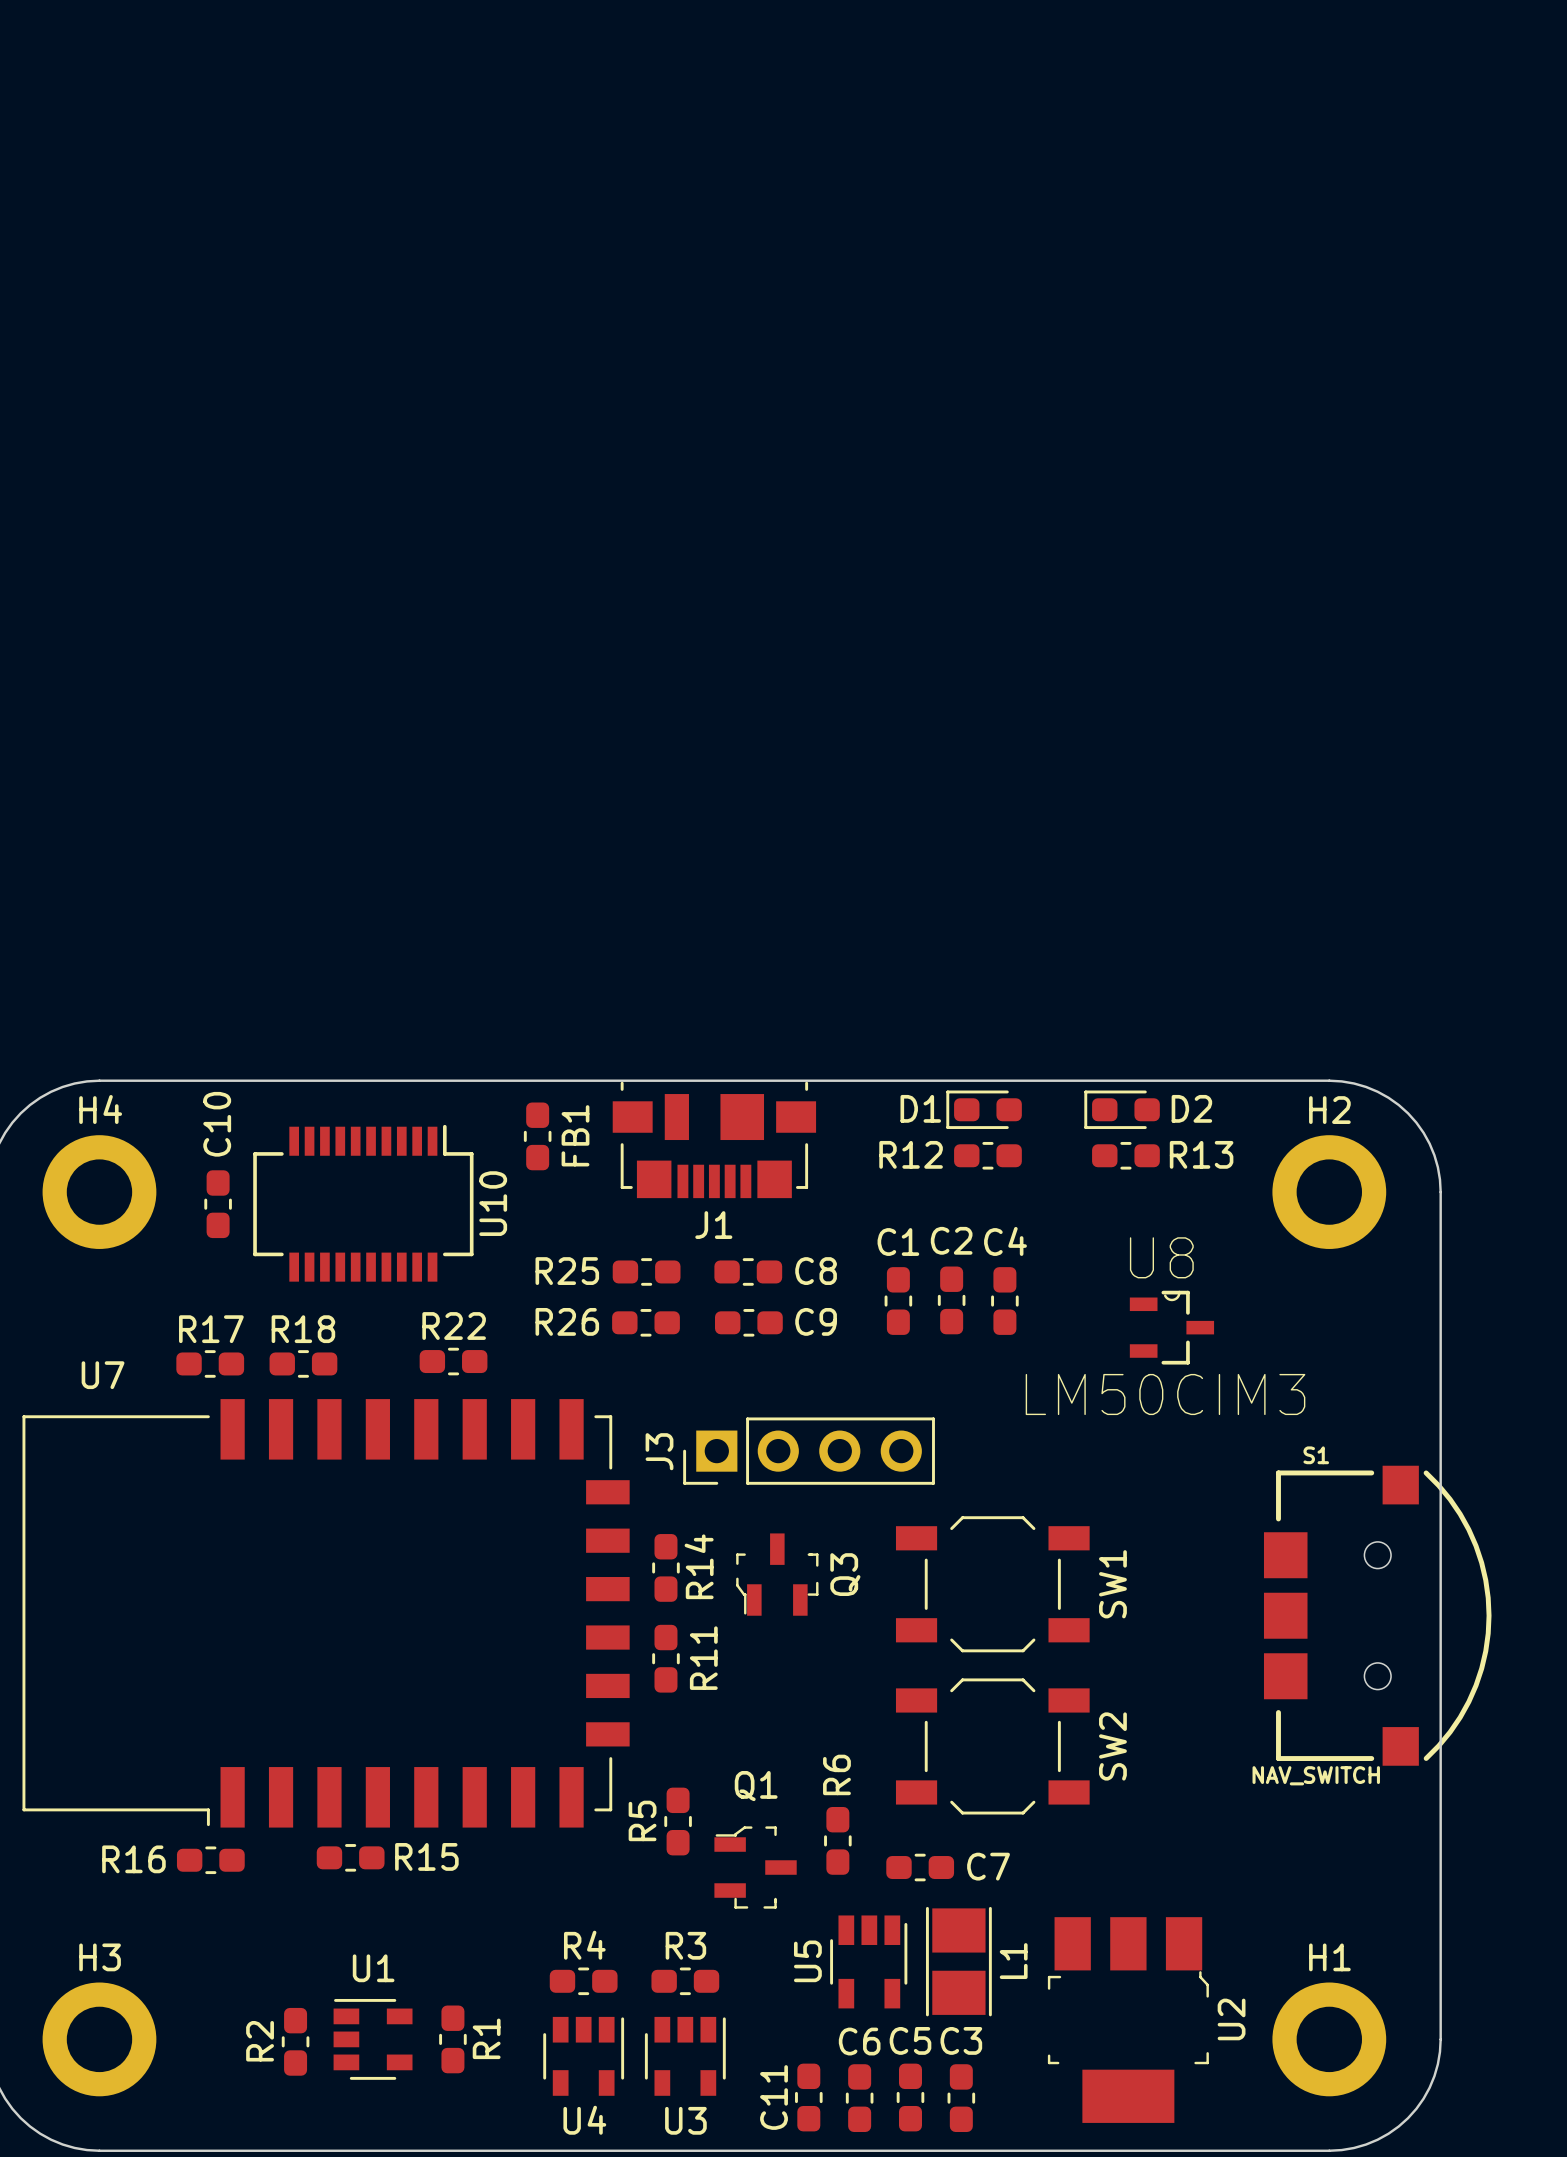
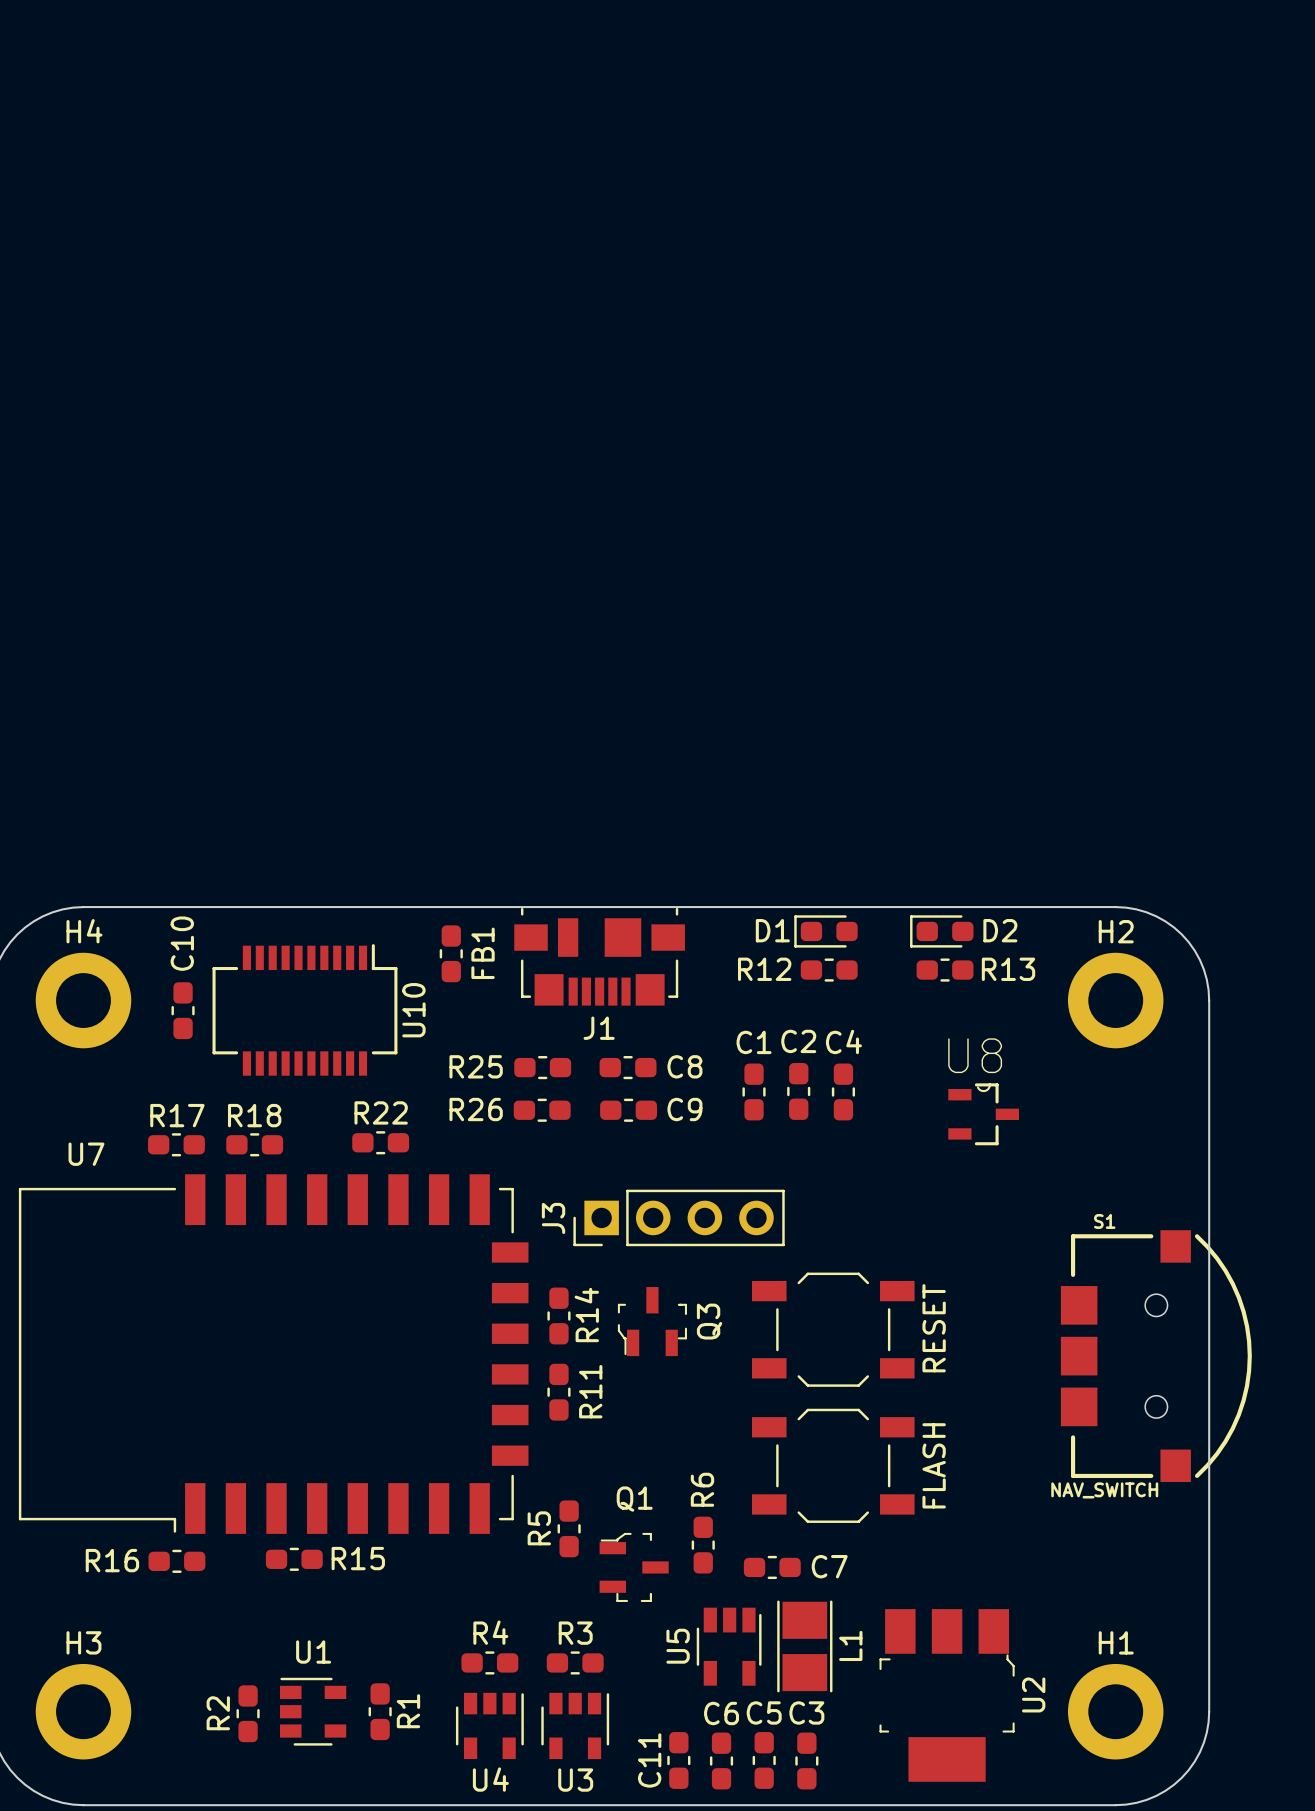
U8 value: LM50CIM3 (1165, 1394) -> none
SW1 value: none -> RESET (934, 1328)
SW1 name: SW1 (1112, 1584) -> none
SW2 name: SW2 (1112, 1746) -> none
SW2 value: none -> FLASH (934, 1465)

